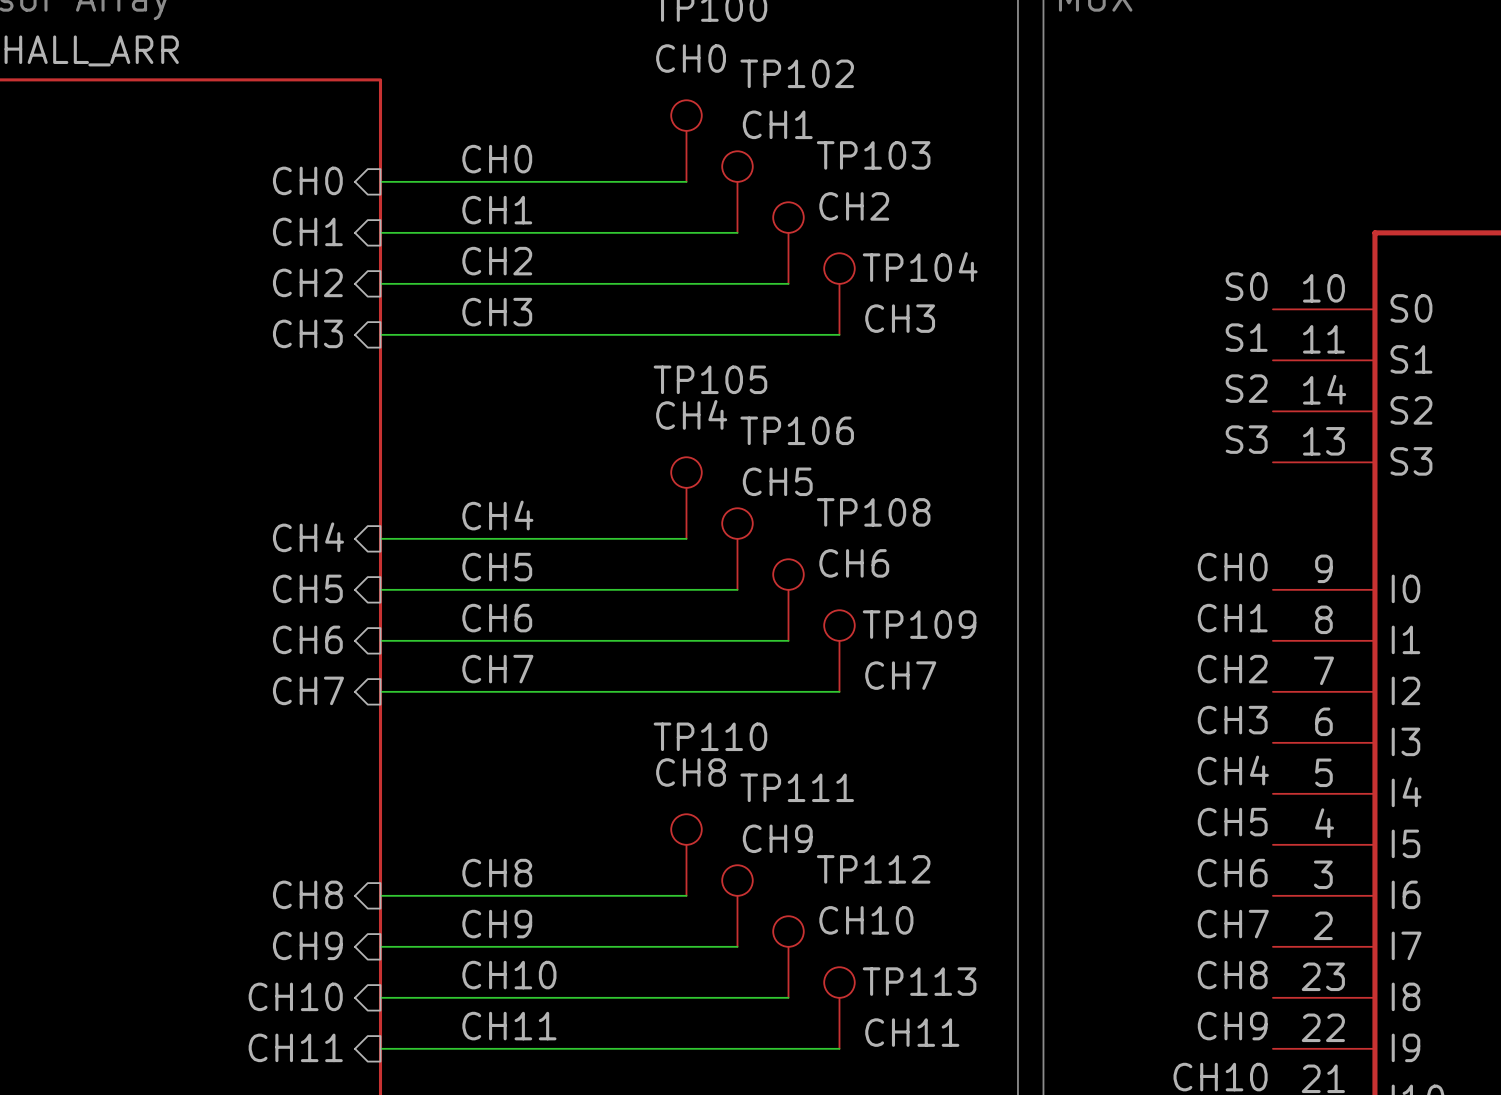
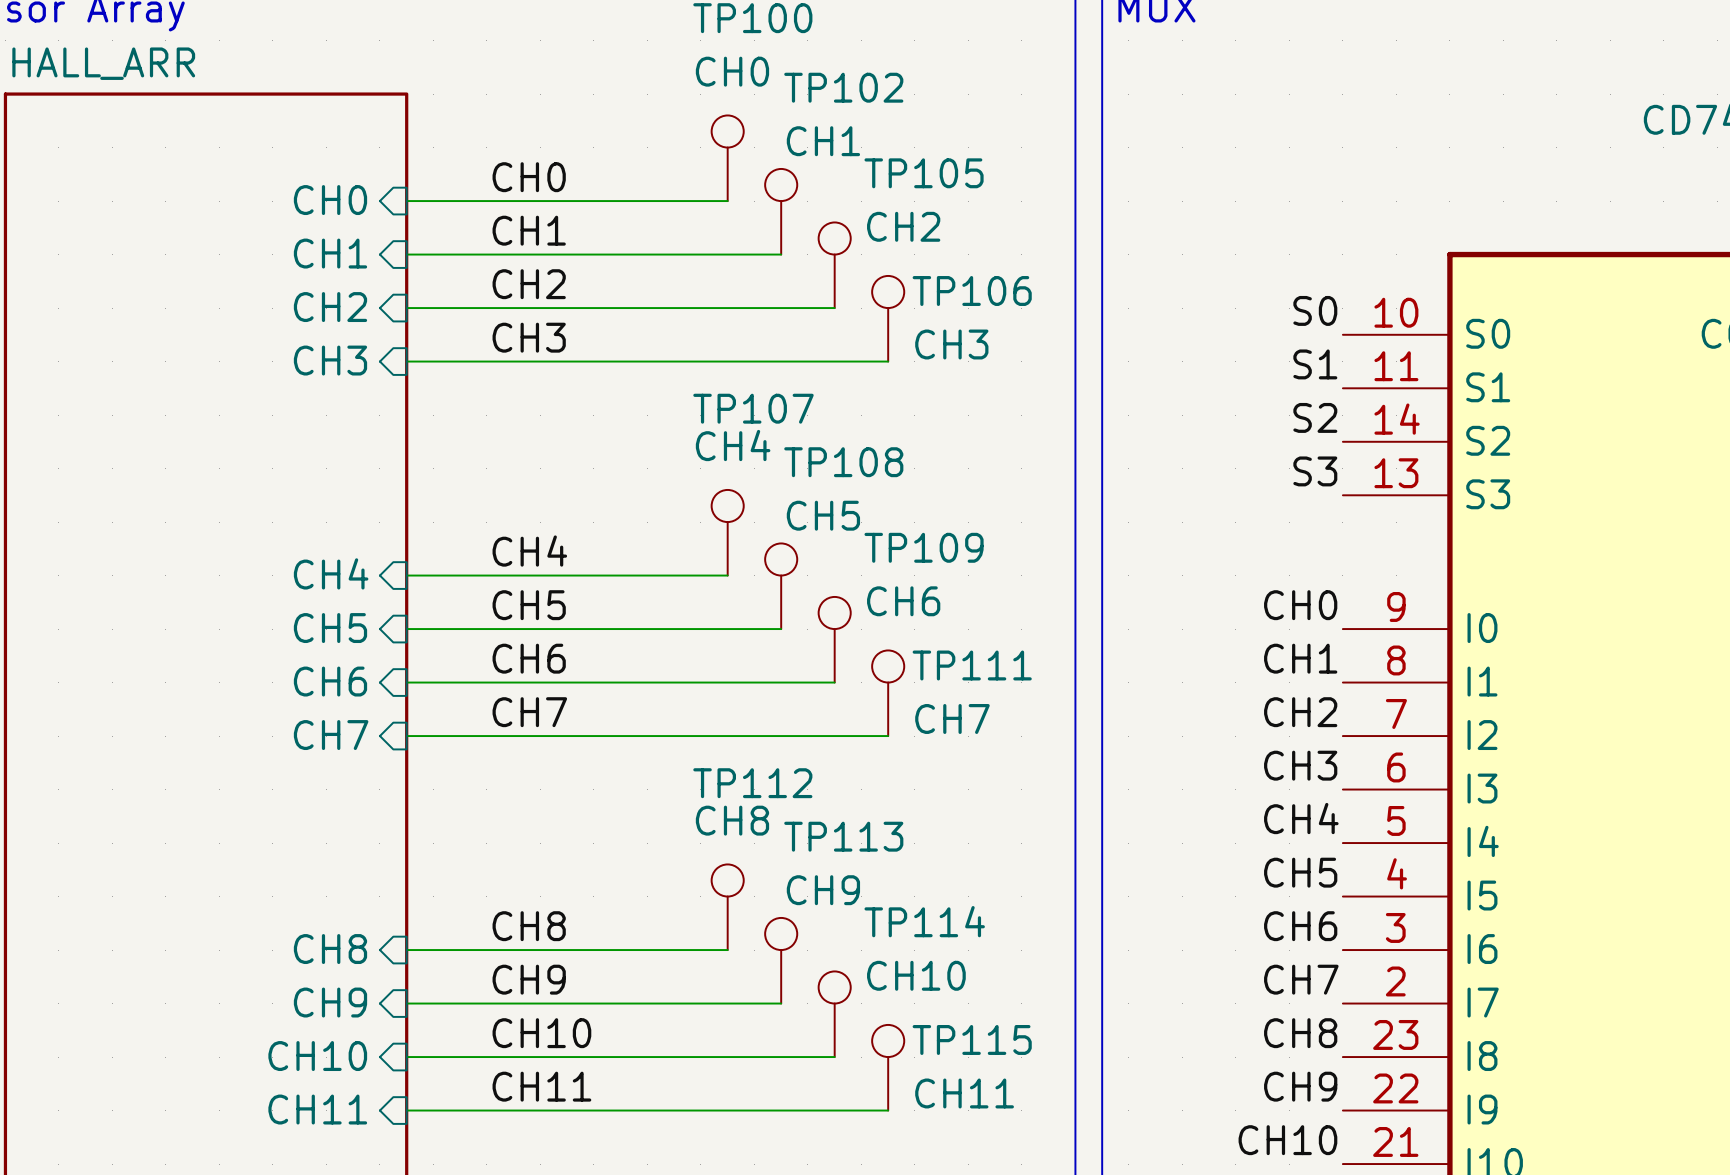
TP103 name: TP103 (873, 155) -> TP105 (924, 173)
TP104 name: TP104 (920, 267) -> TP106 (972, 291)
TP105 name: TP105 (710, 379) -> TP107 (753, 408)
TP106 name: TP106 (797, 430) -> TP108 (843, 462)
TP108 name: TP108 (873, 512) -> TP109 (924, 547)
TP109 name: TP109 (919, 624) -> TP111 (972, 665)
TP110 name: TP110 (710, 736) -> TP112 (752, 783)
TP111 name: TP111 (797, 787) -> TP113 (843, 836)
TP112 name: TP112 (873, 869) -> TP114 (924, 921)
TP113 name: TP113 (919, 981) -> TP115 (972, 1039)

